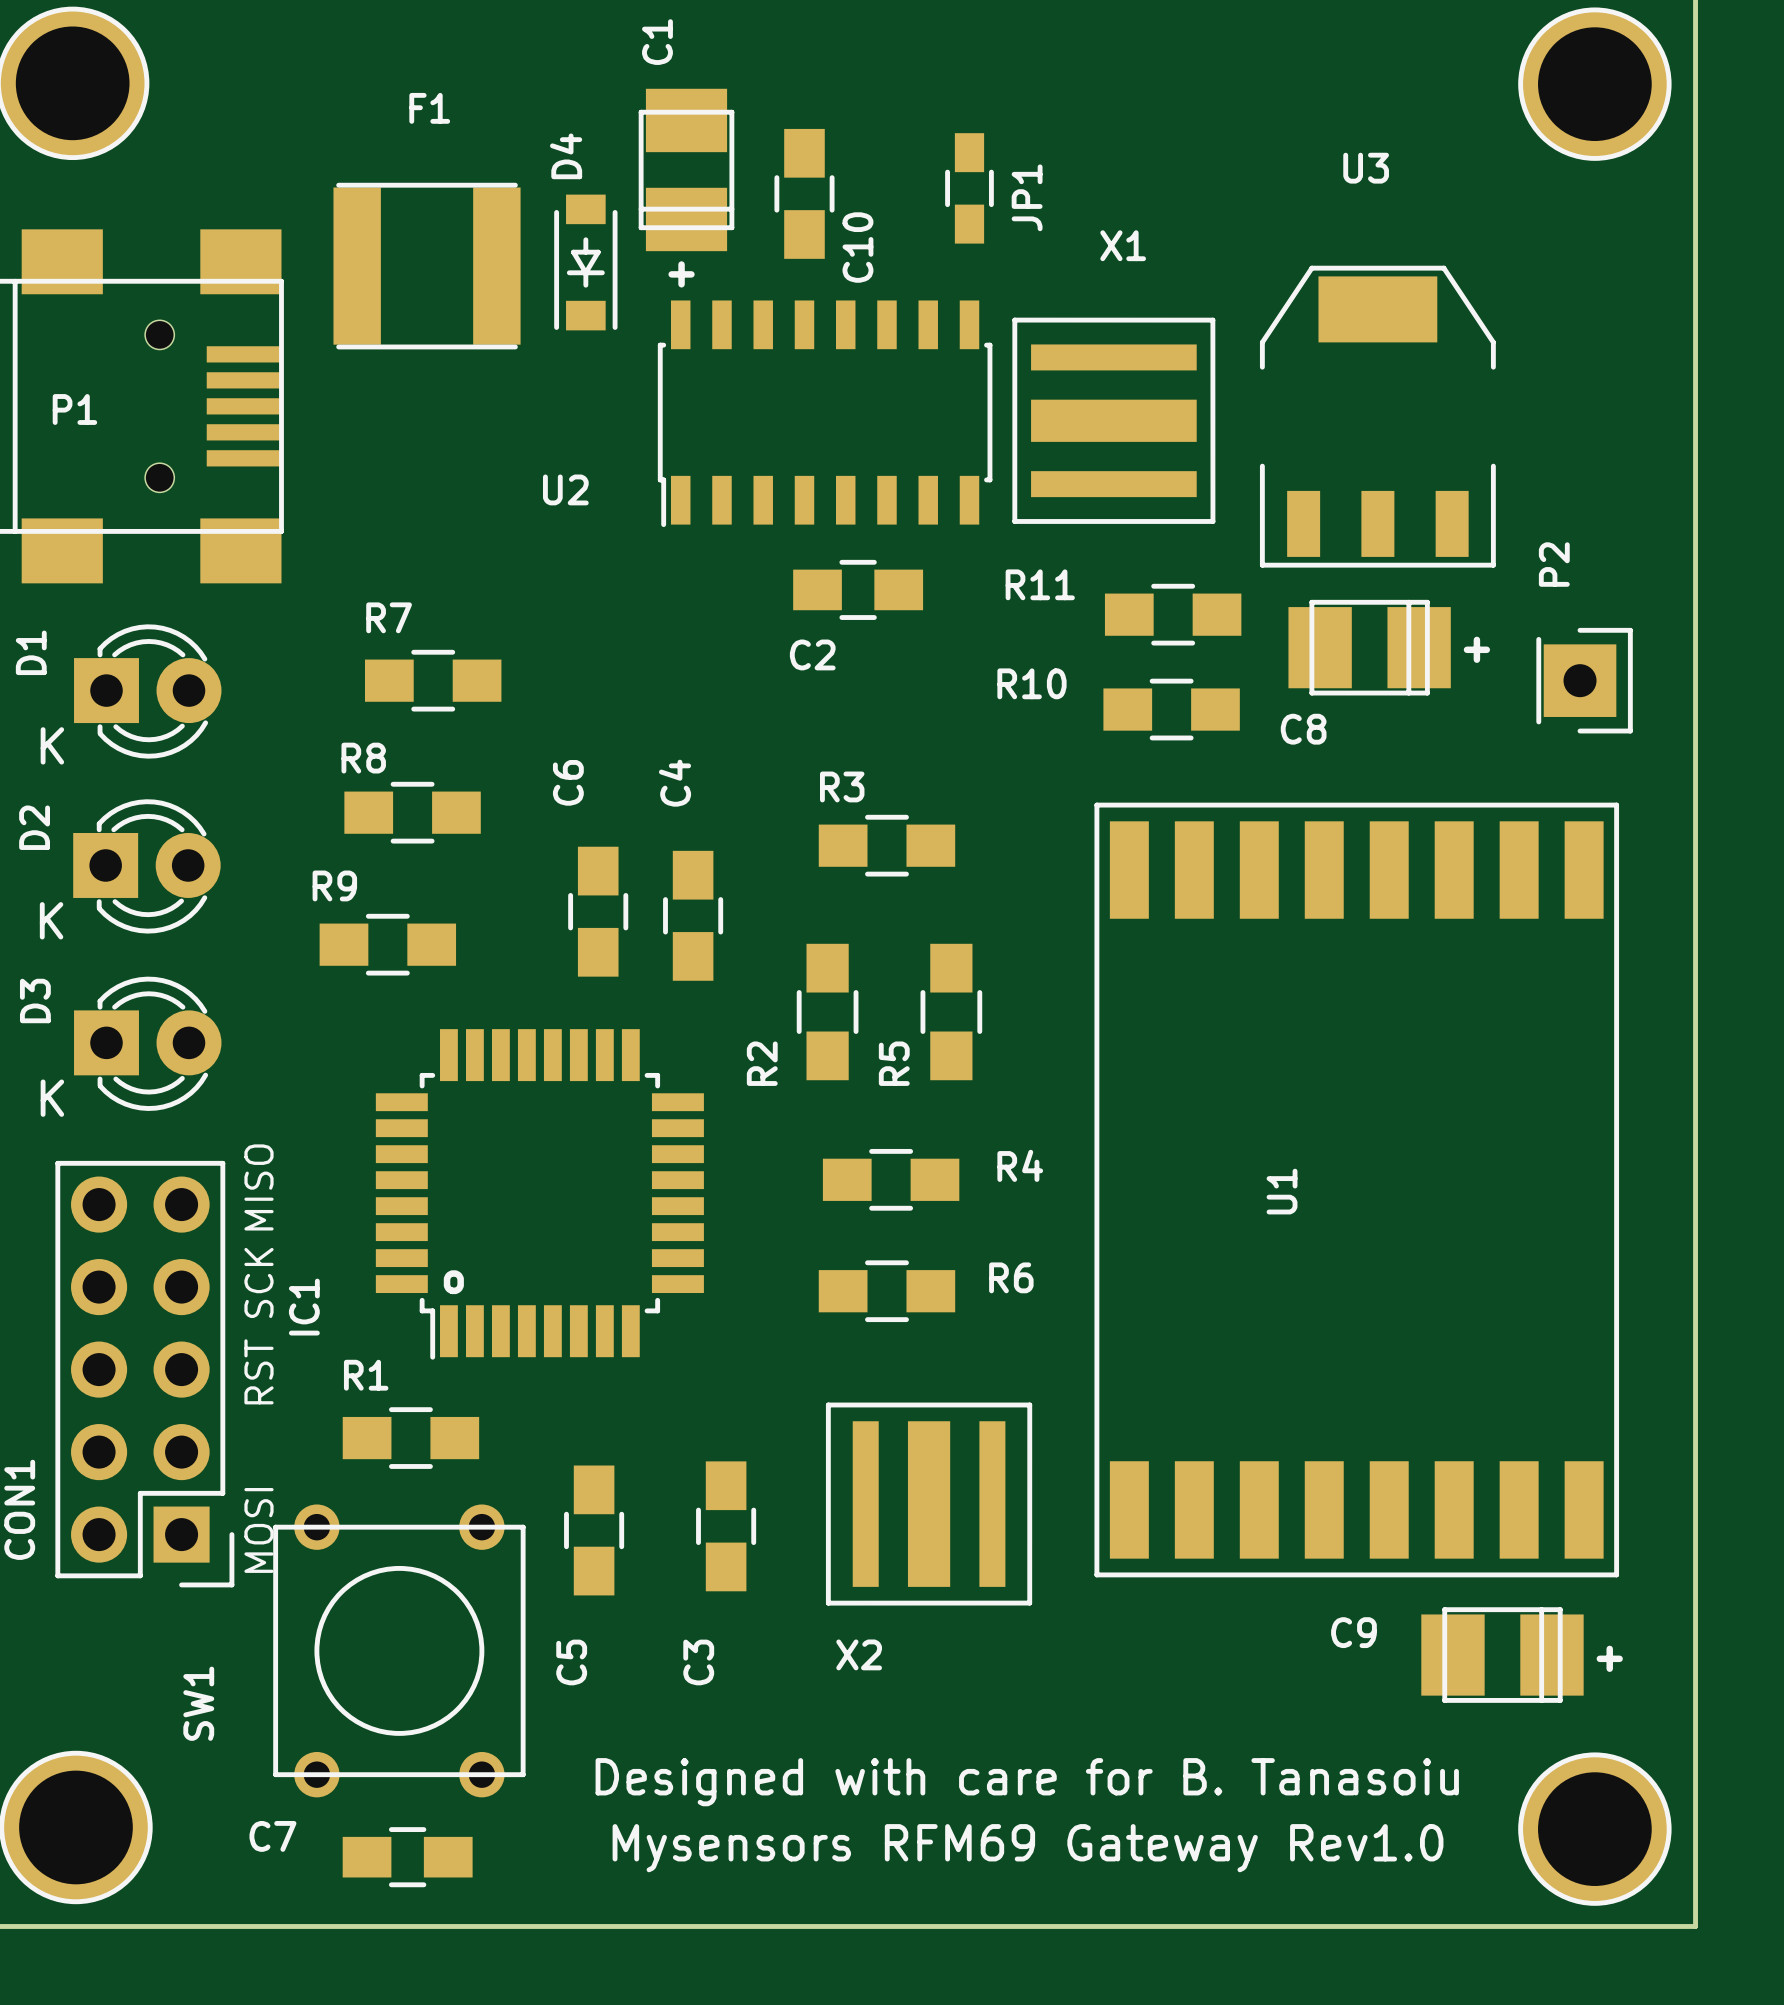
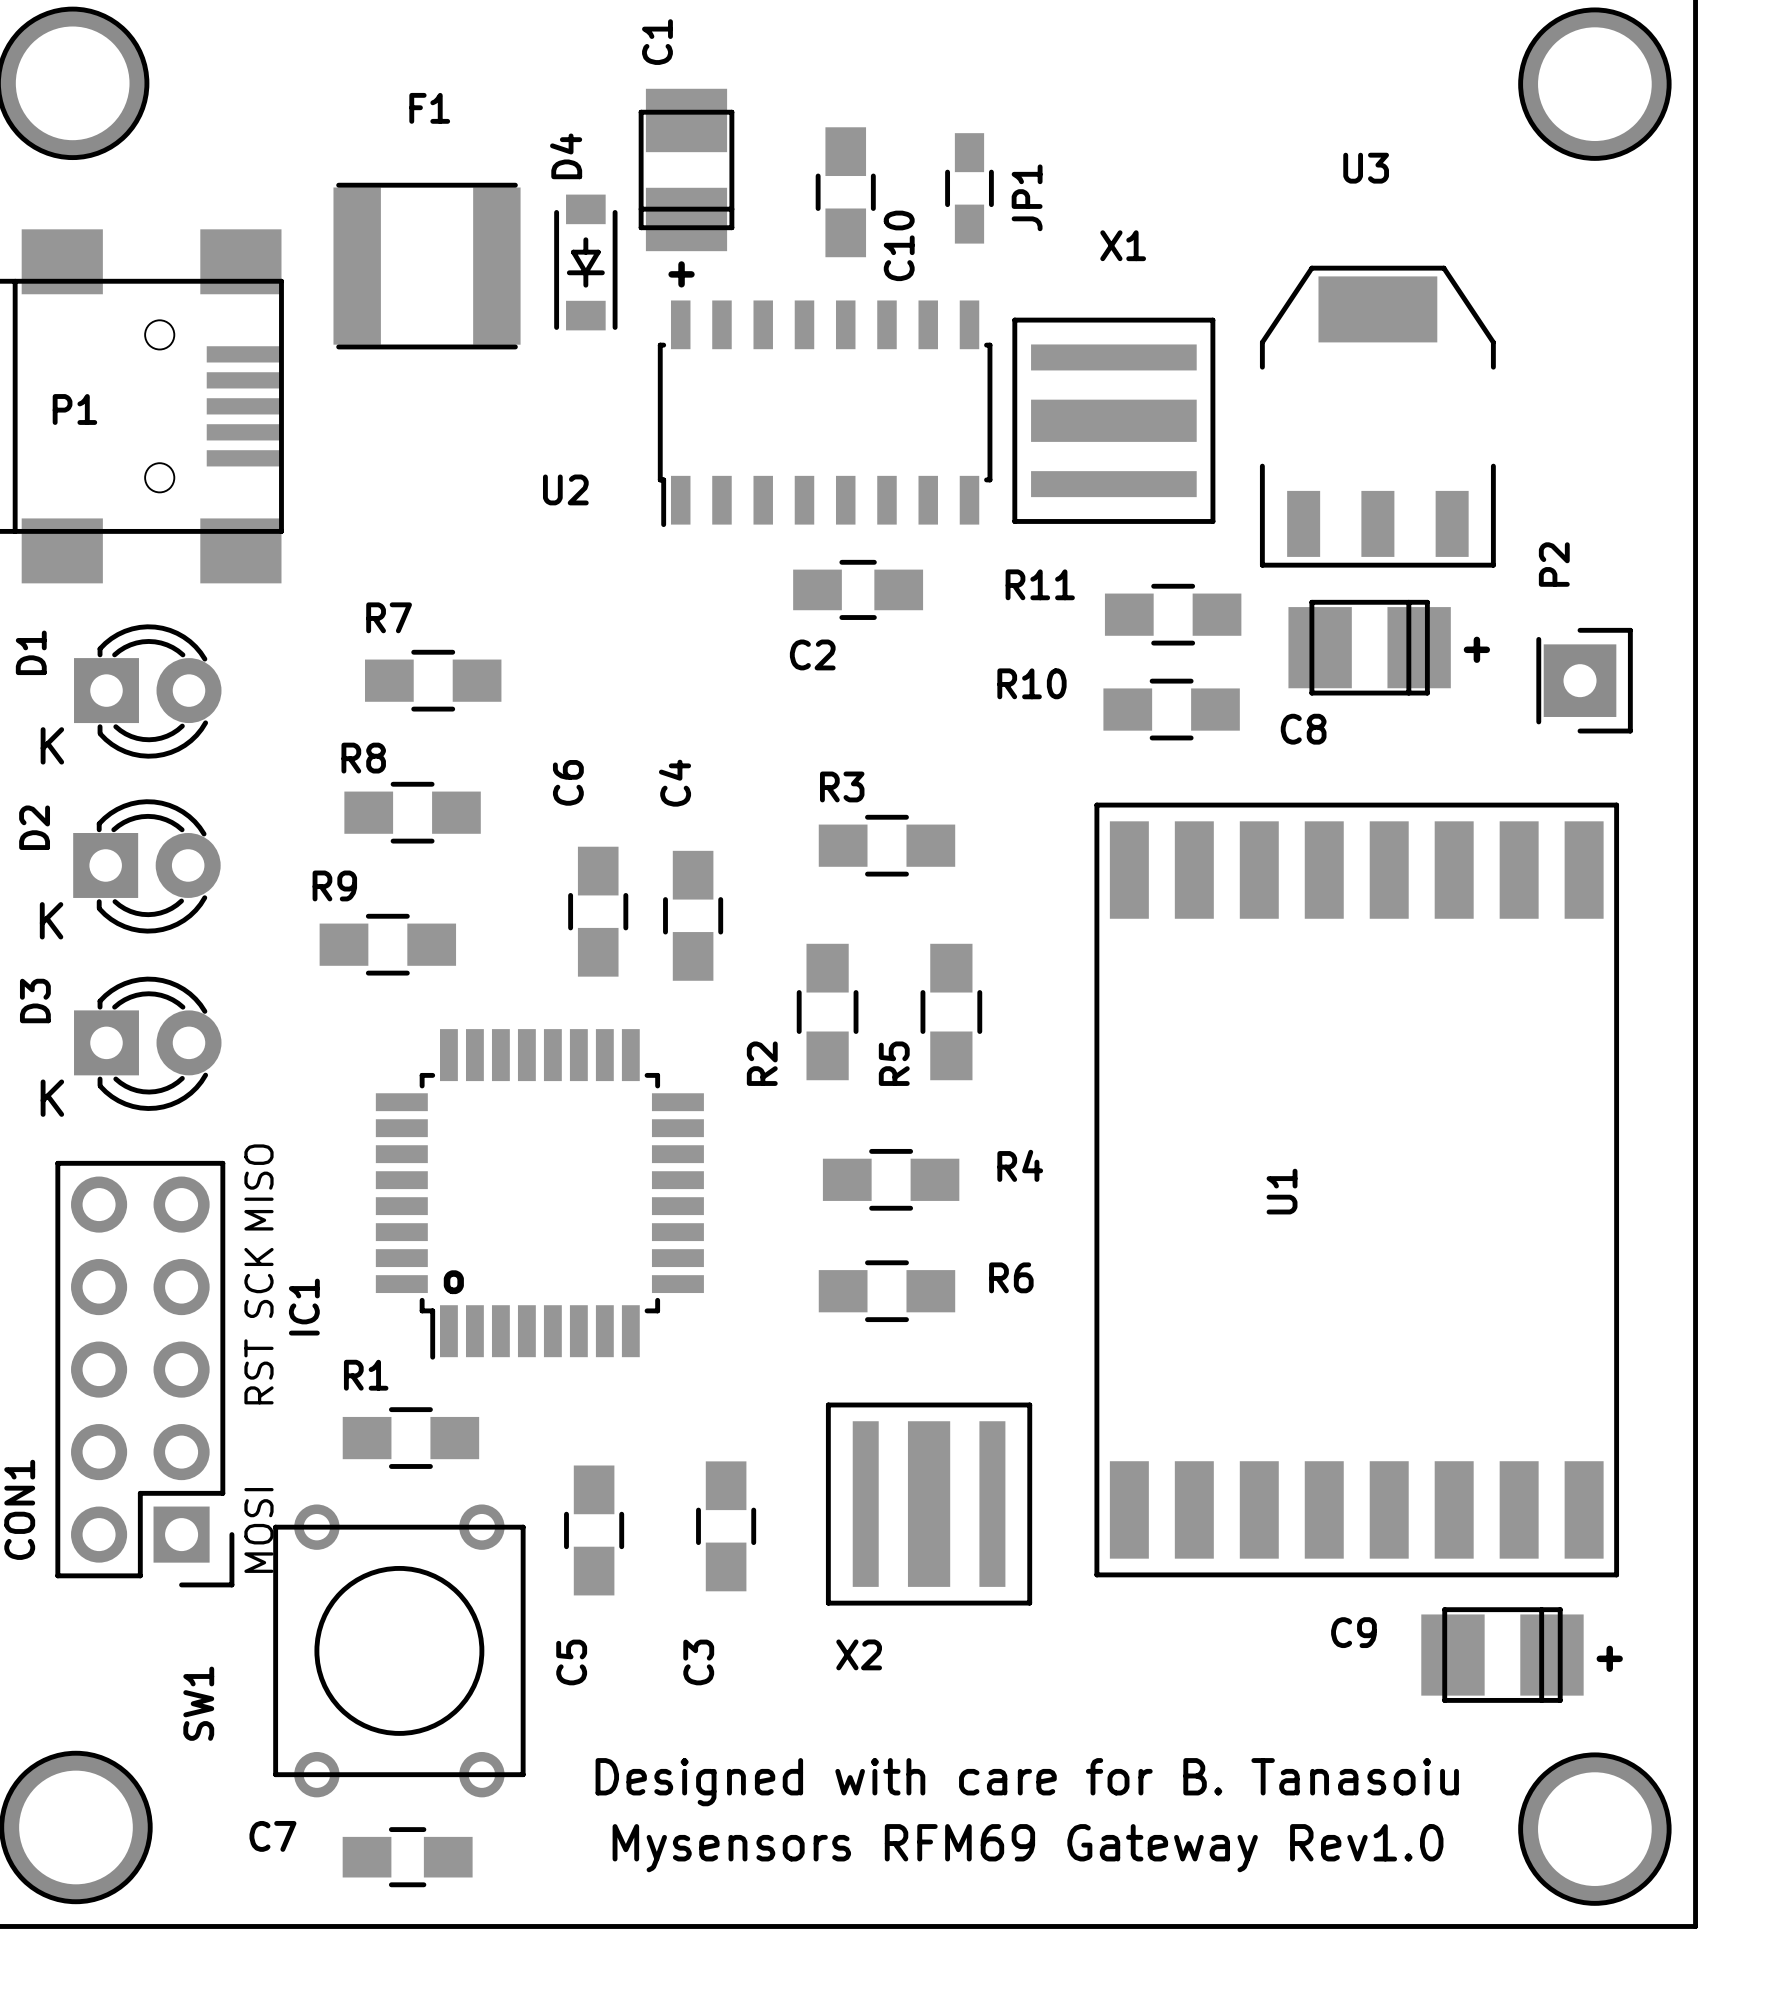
C10 position: (804, 193) -> (845, 192)

